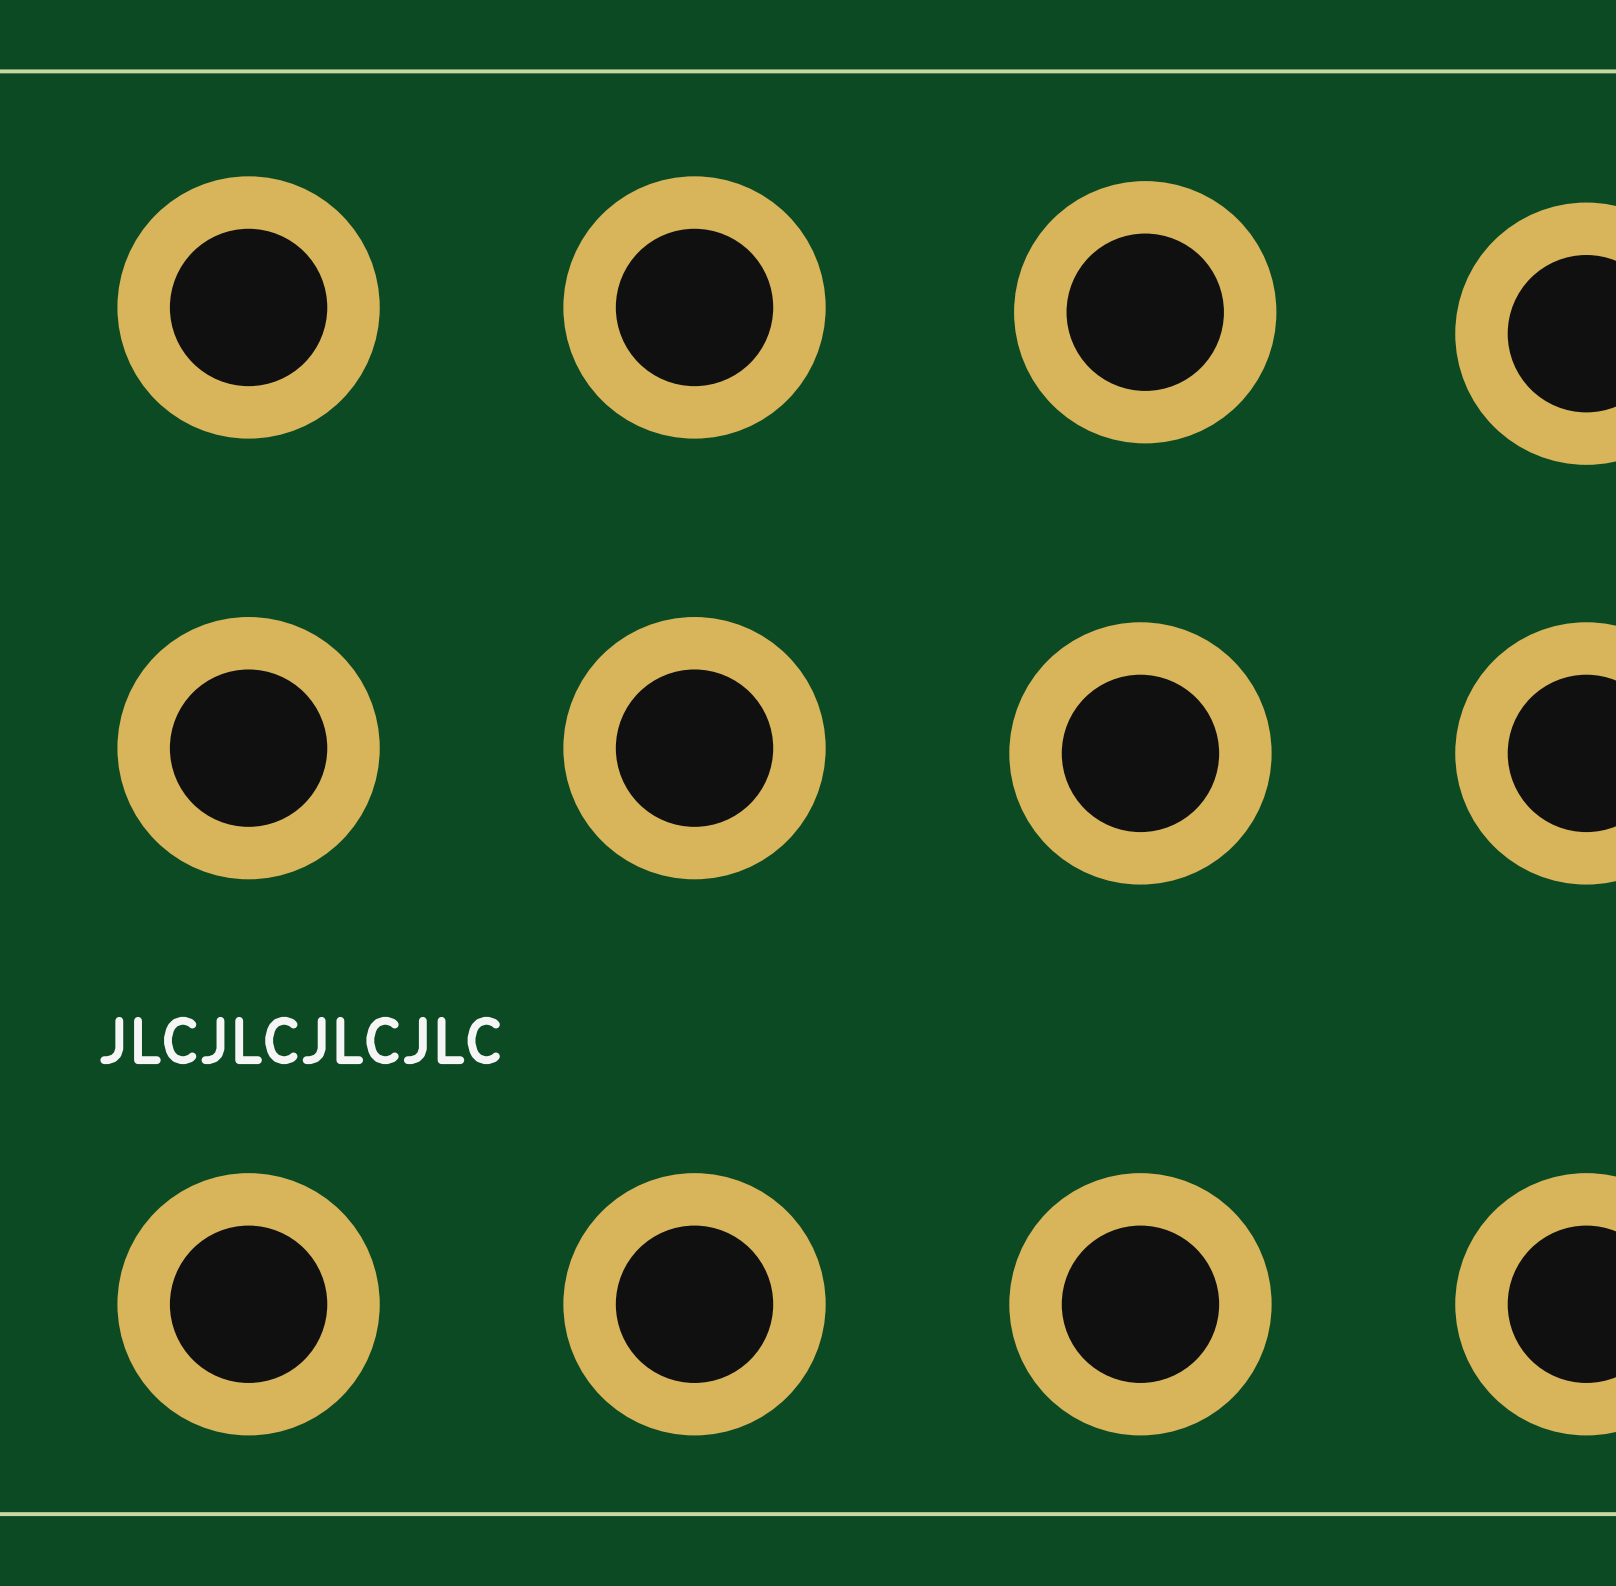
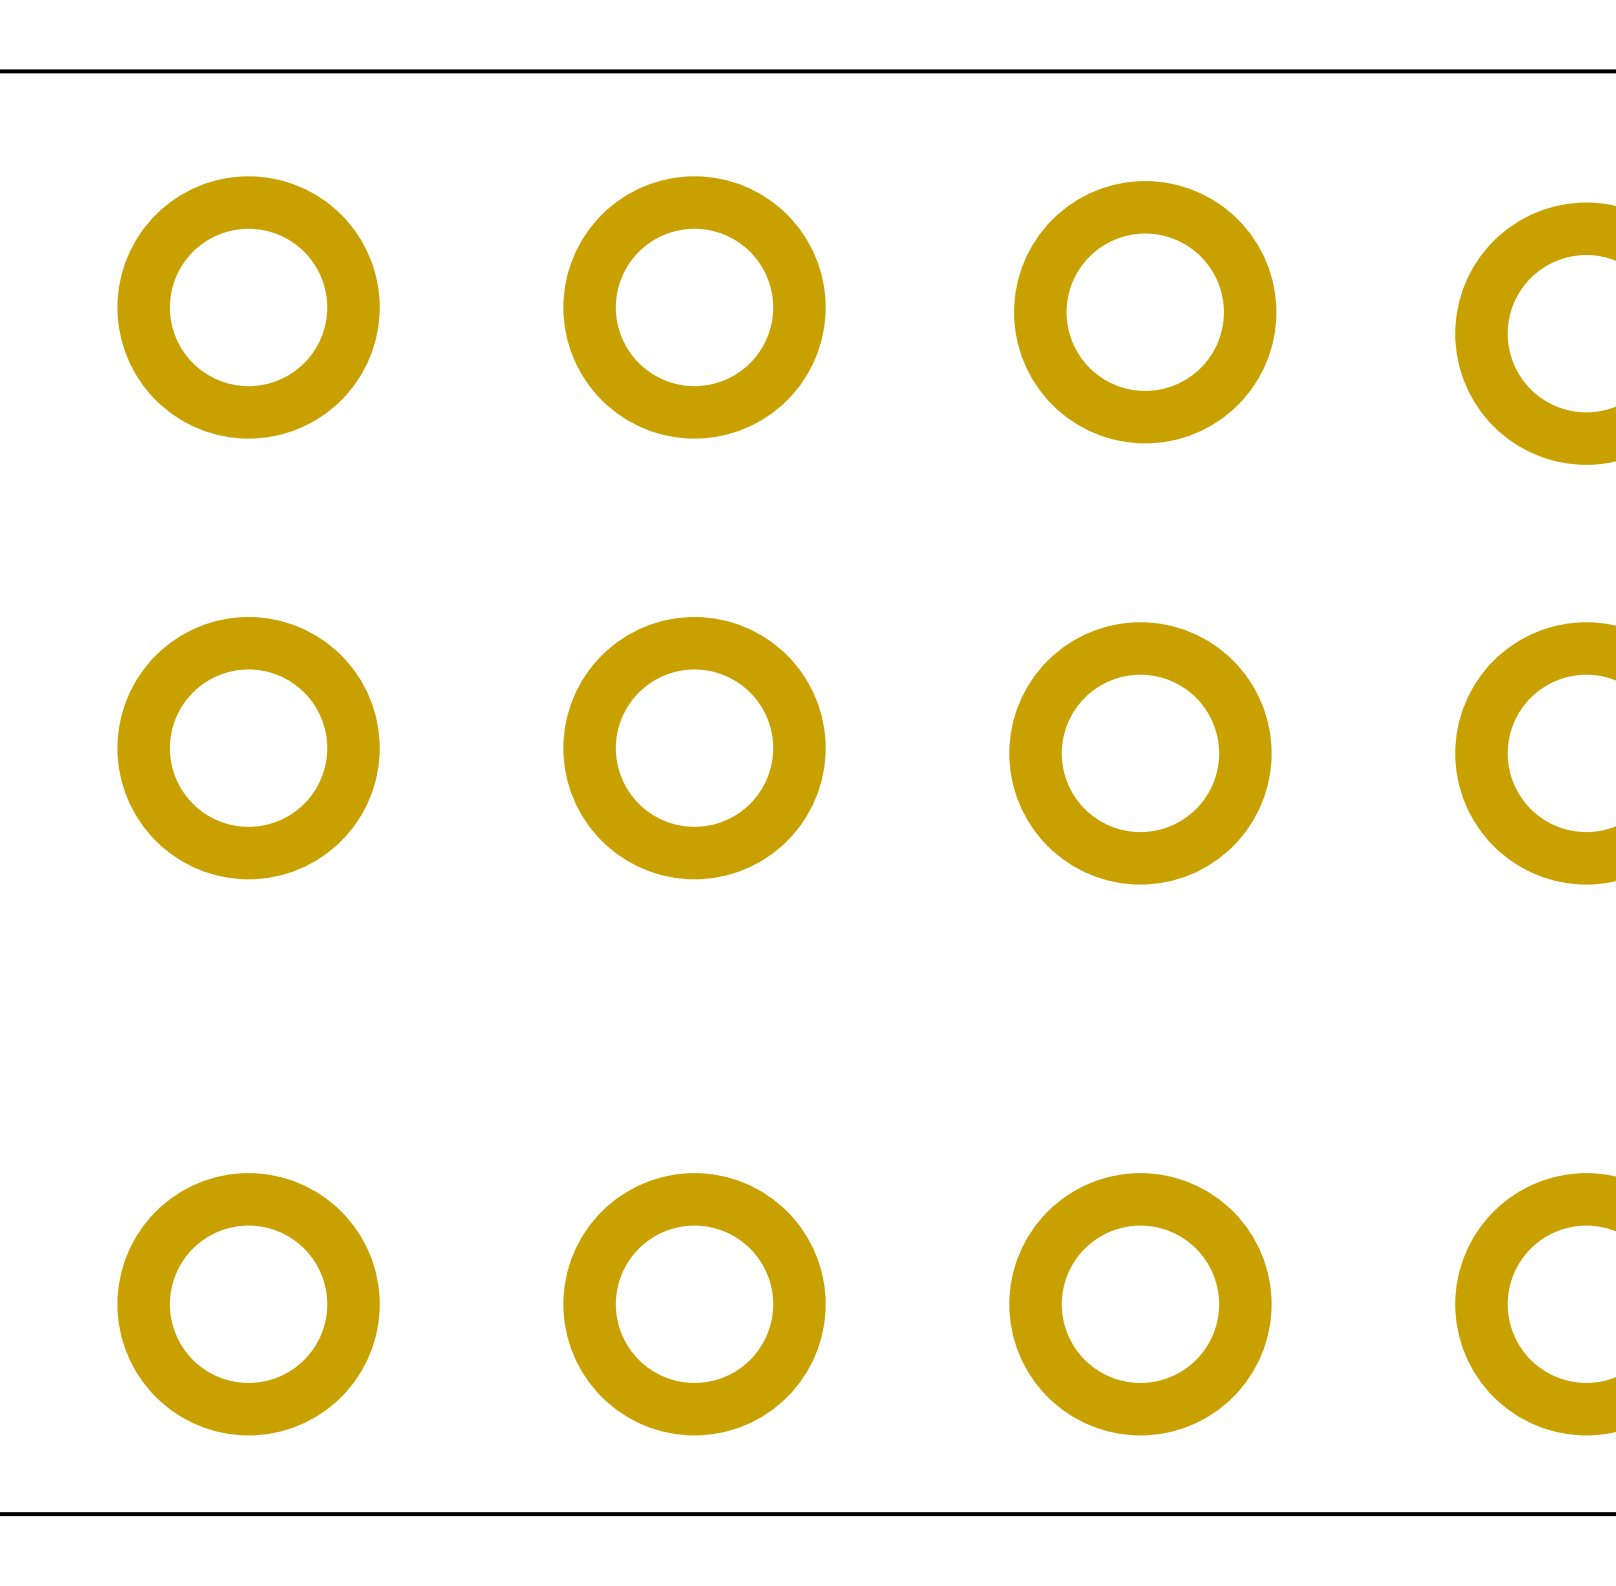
text: JLCJLCJLCJLC (300, 1040) -> none

